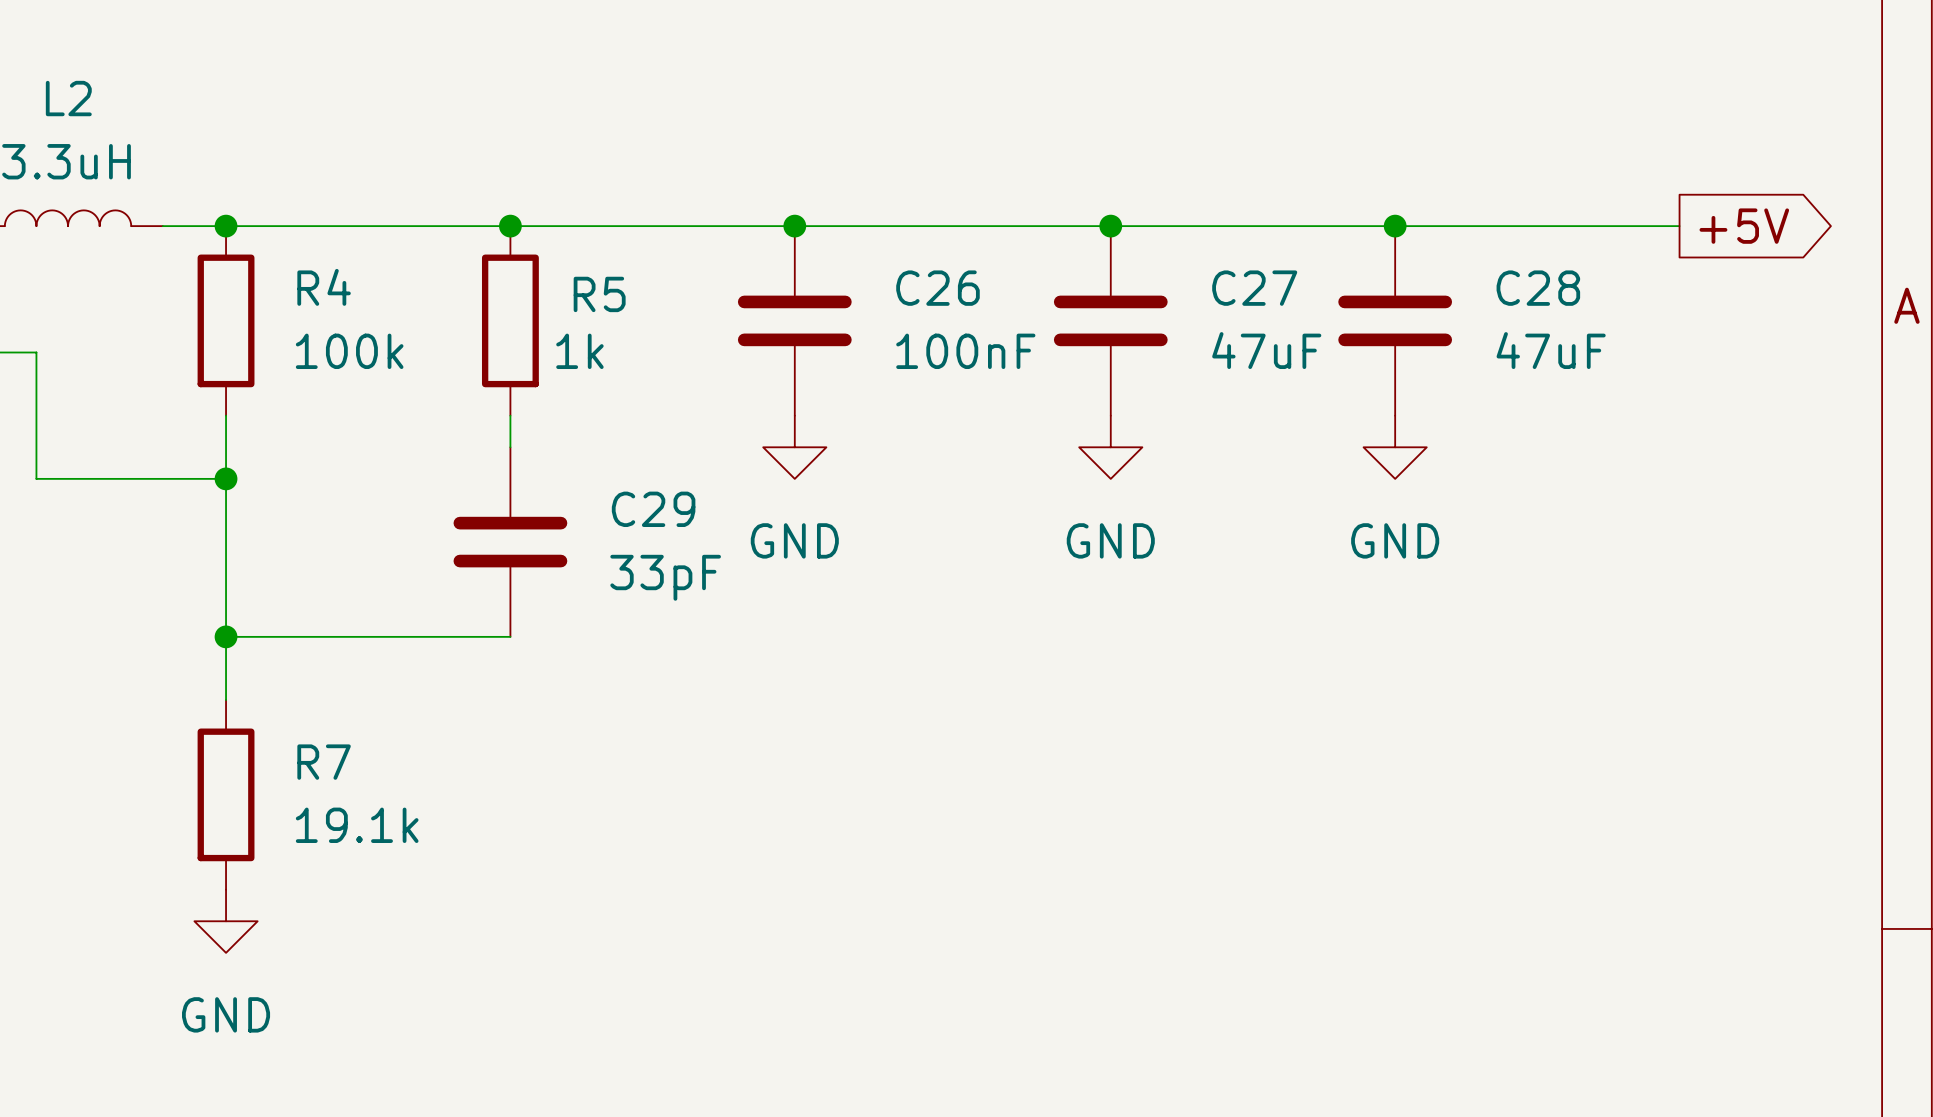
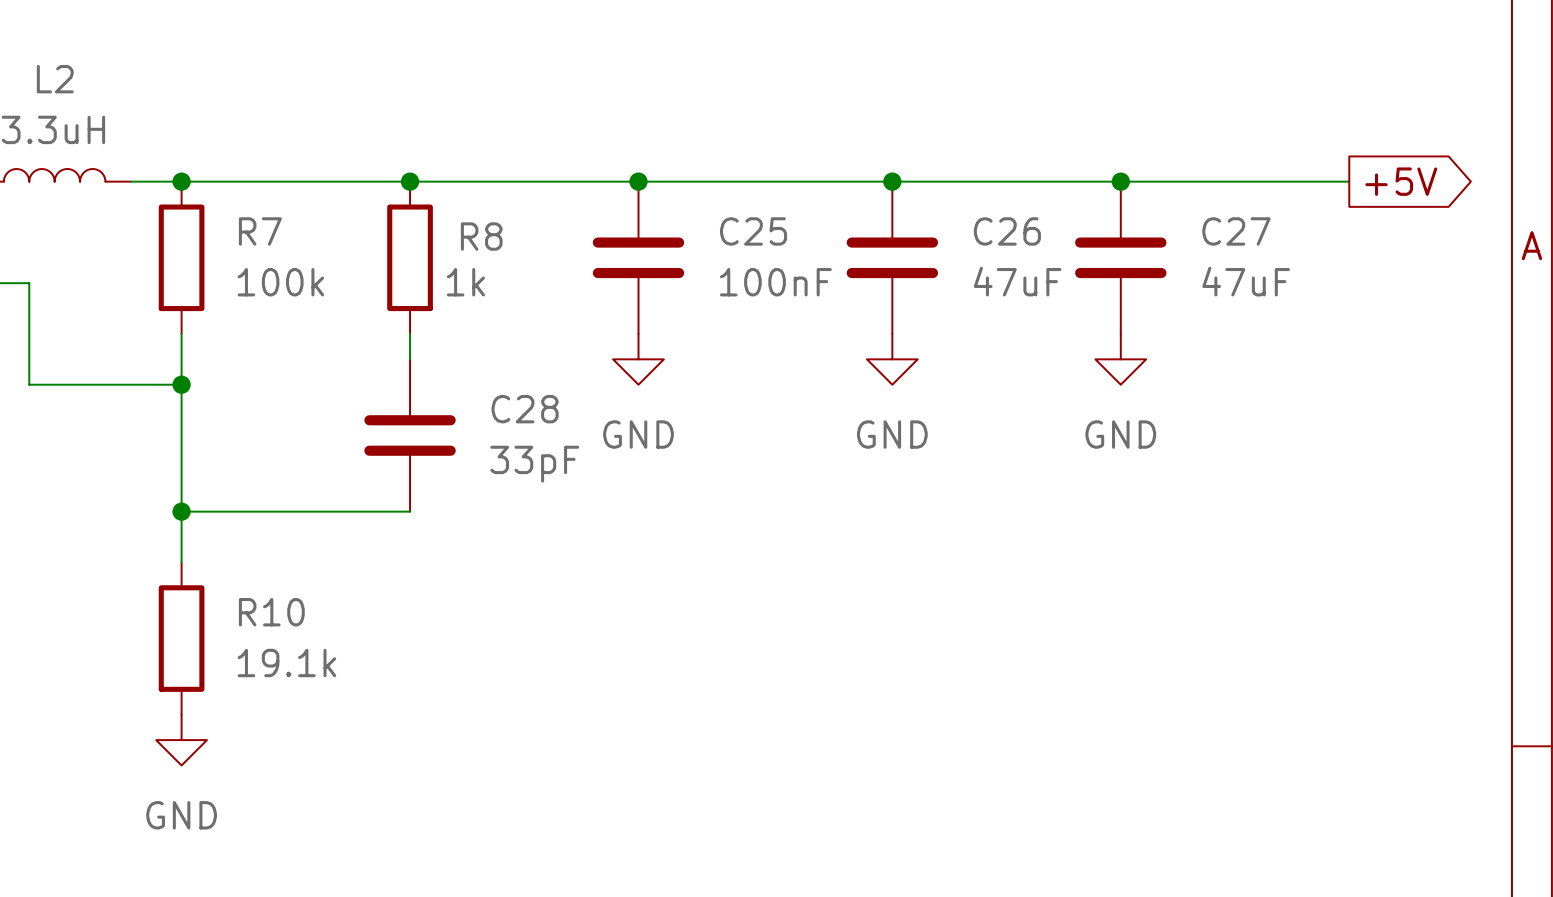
R4 name: R4 (324, 287) -> R7 (260, 231)
C26 name: C26 (937, 288) -> C25 (753, 231)
C27 name: C27 (1254, 288) -> C26 (1007, 231)
C28 name: C28 (1538, 288) -> C27 (1236, 231)
R5 name: R5 (599, 294) -> R8 (481, 236)
C29 name: C29 (653, 509) -> C28 (525, 409)
R7 name: R7 (324, 762) -> R10 (271, 612)

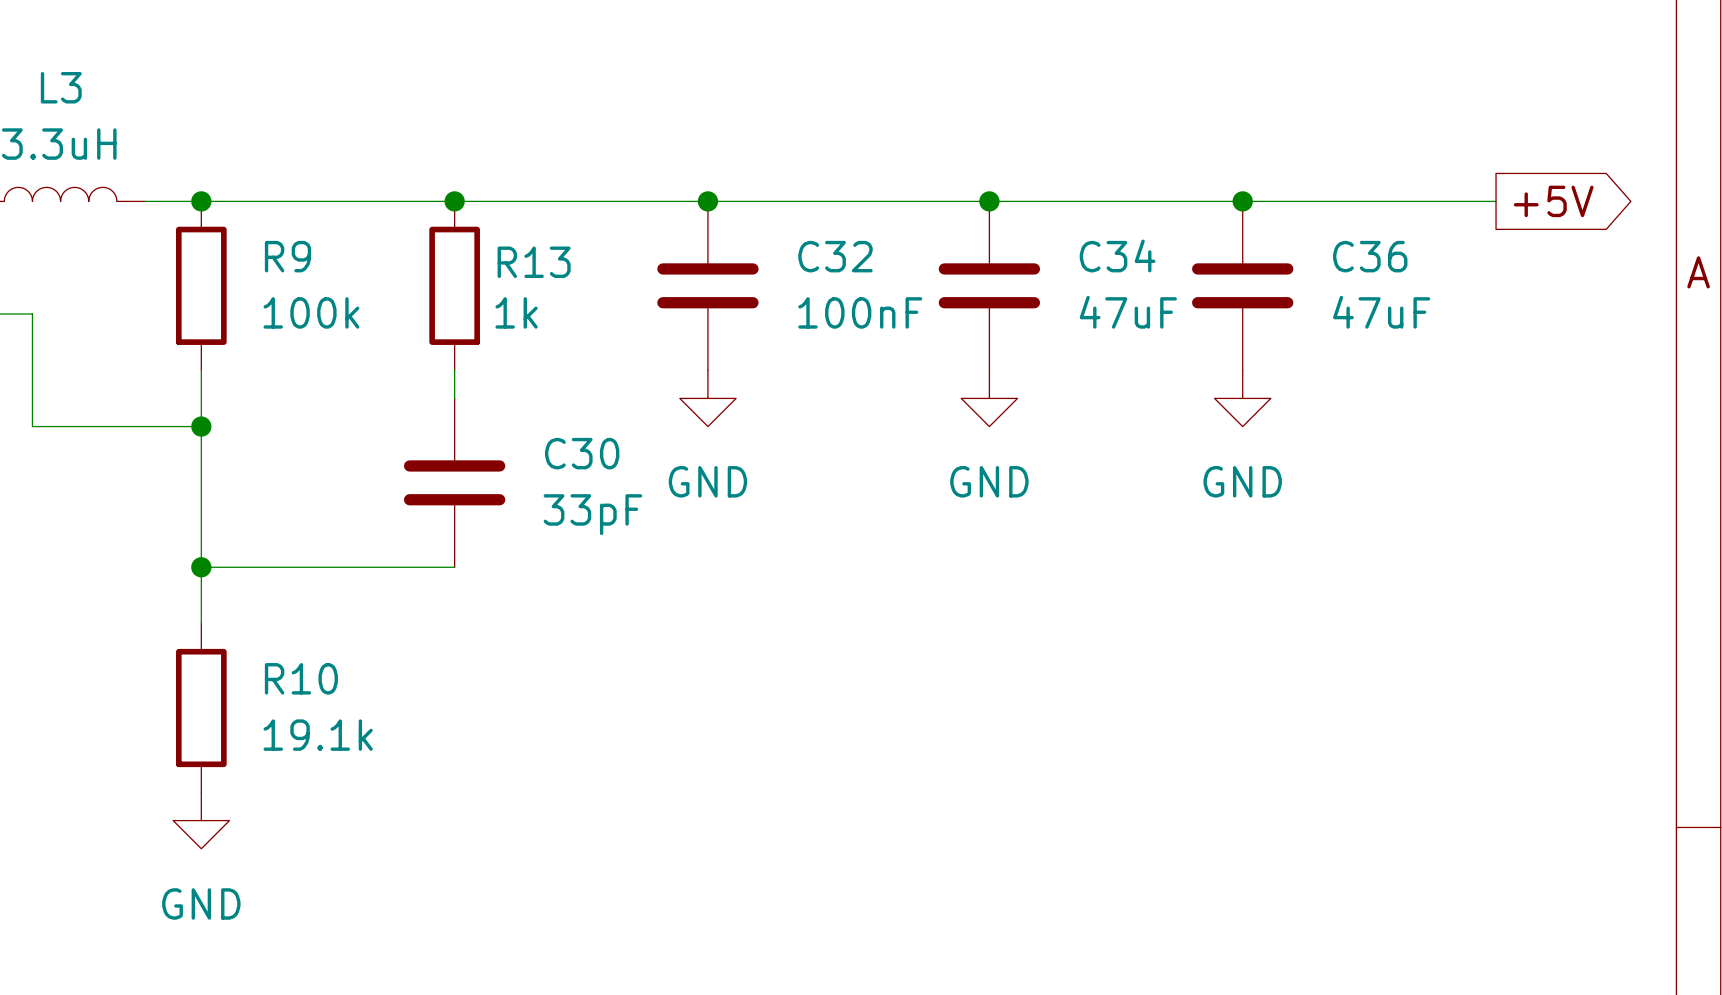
L2 name: L2 (55, 79) -> L3 (61, 87)
R7 name: R7 (260, 231) -> R9 (287, 256)
C25 name: C25 (753, 231) -> C32 (835, 256)
C26 name: C26 (1007, 231) -> C34 (1117, 255)
C27 name: C27 (1236, 231) -> C36 (1370, 256)
R8 name: R8 (481, 236) -> R13 (534, 262)
C28 name: C28 (525, 409) -> C30 (582, 453)

